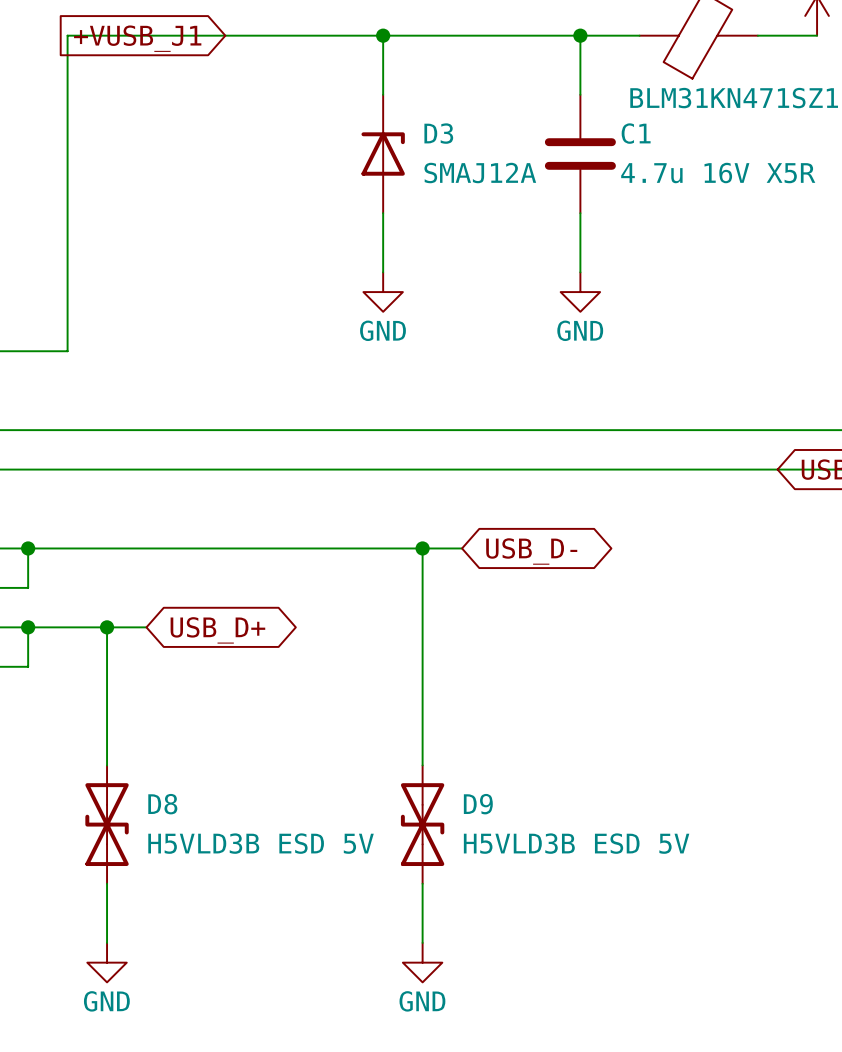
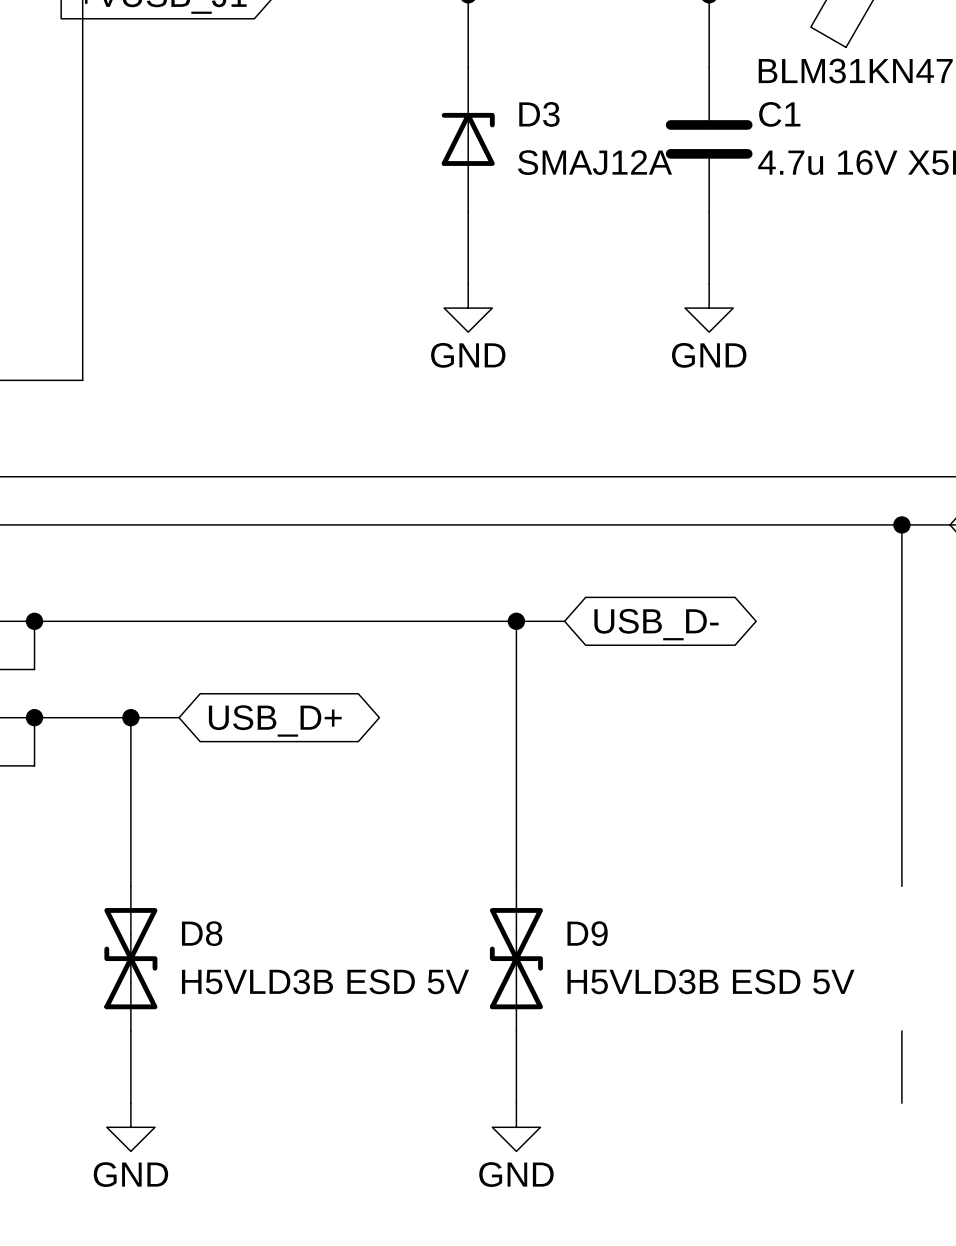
wire: none -> (901, 524) (901, 886)
junction: none -> (901, 524)
wire: none -> (901, 1030) (901, 1103)

